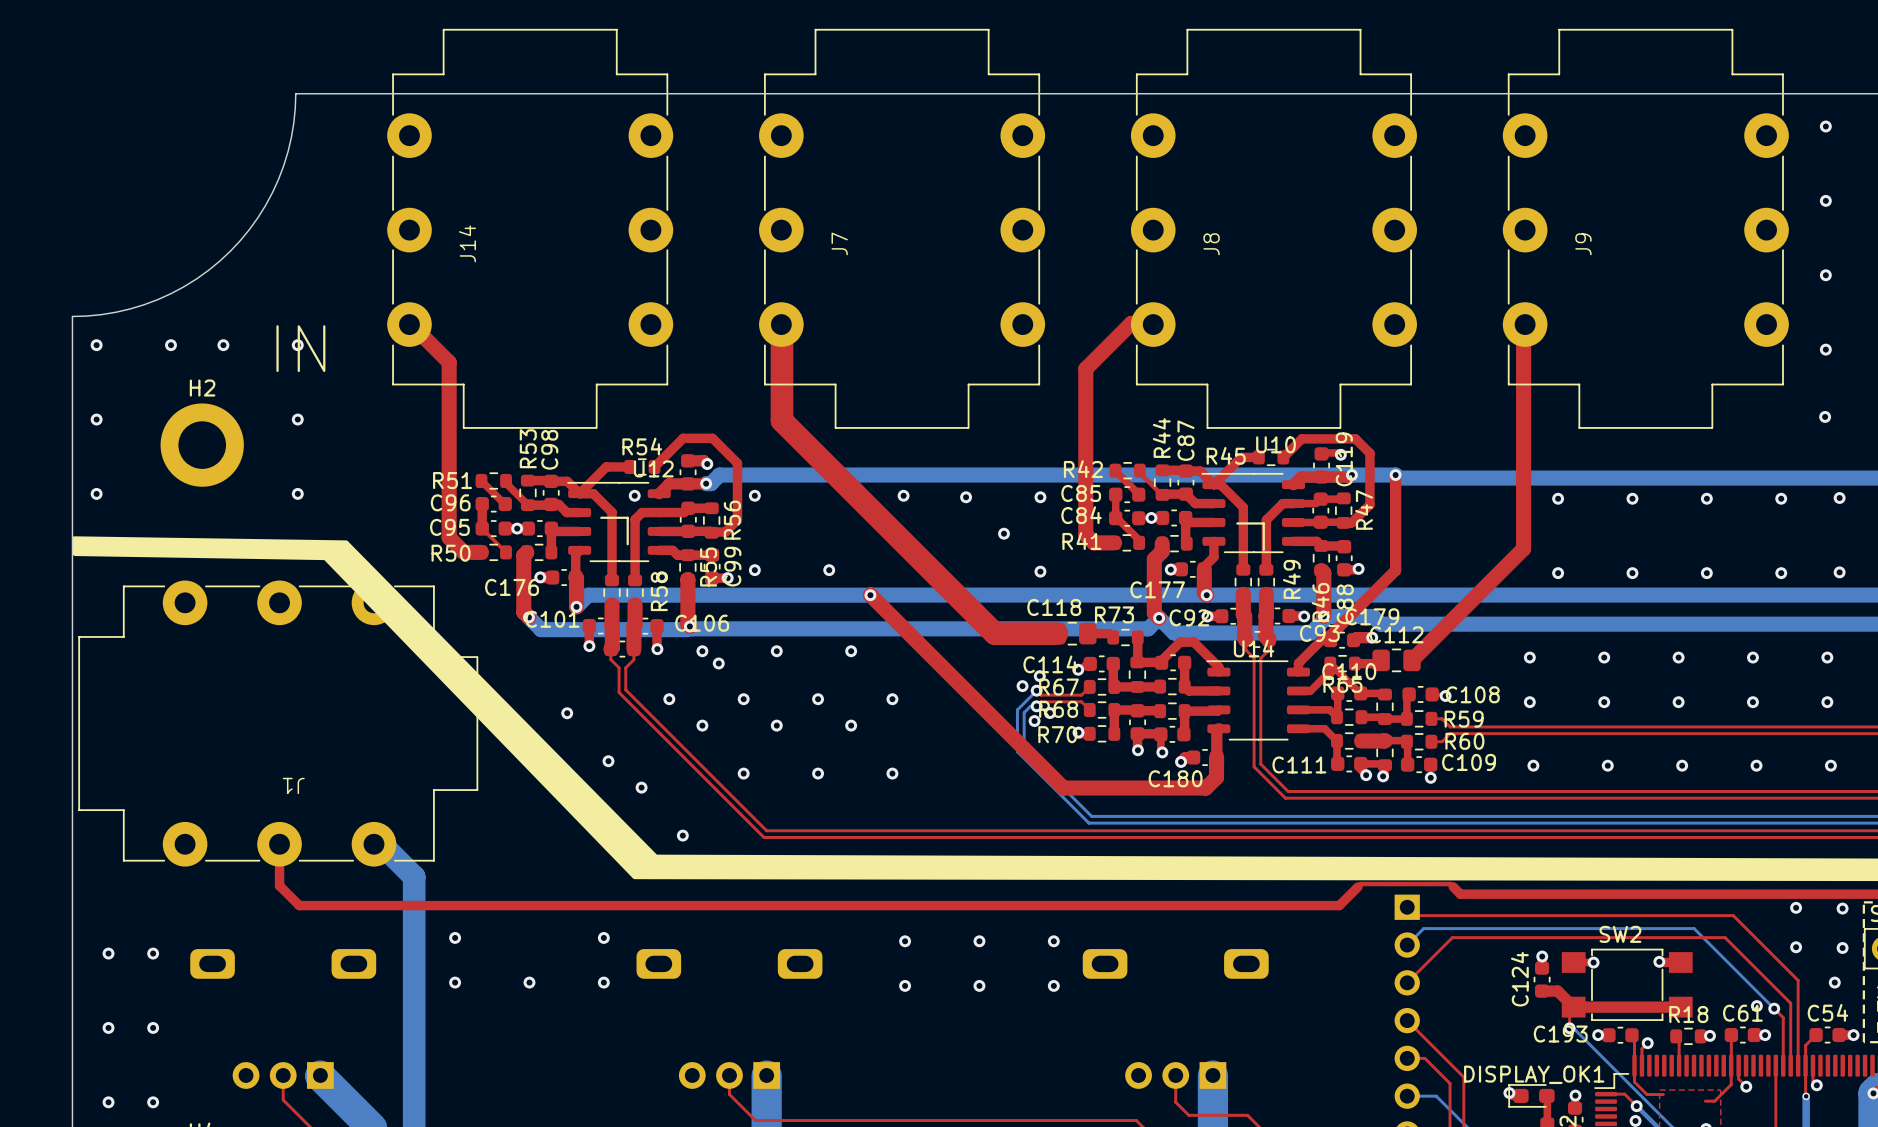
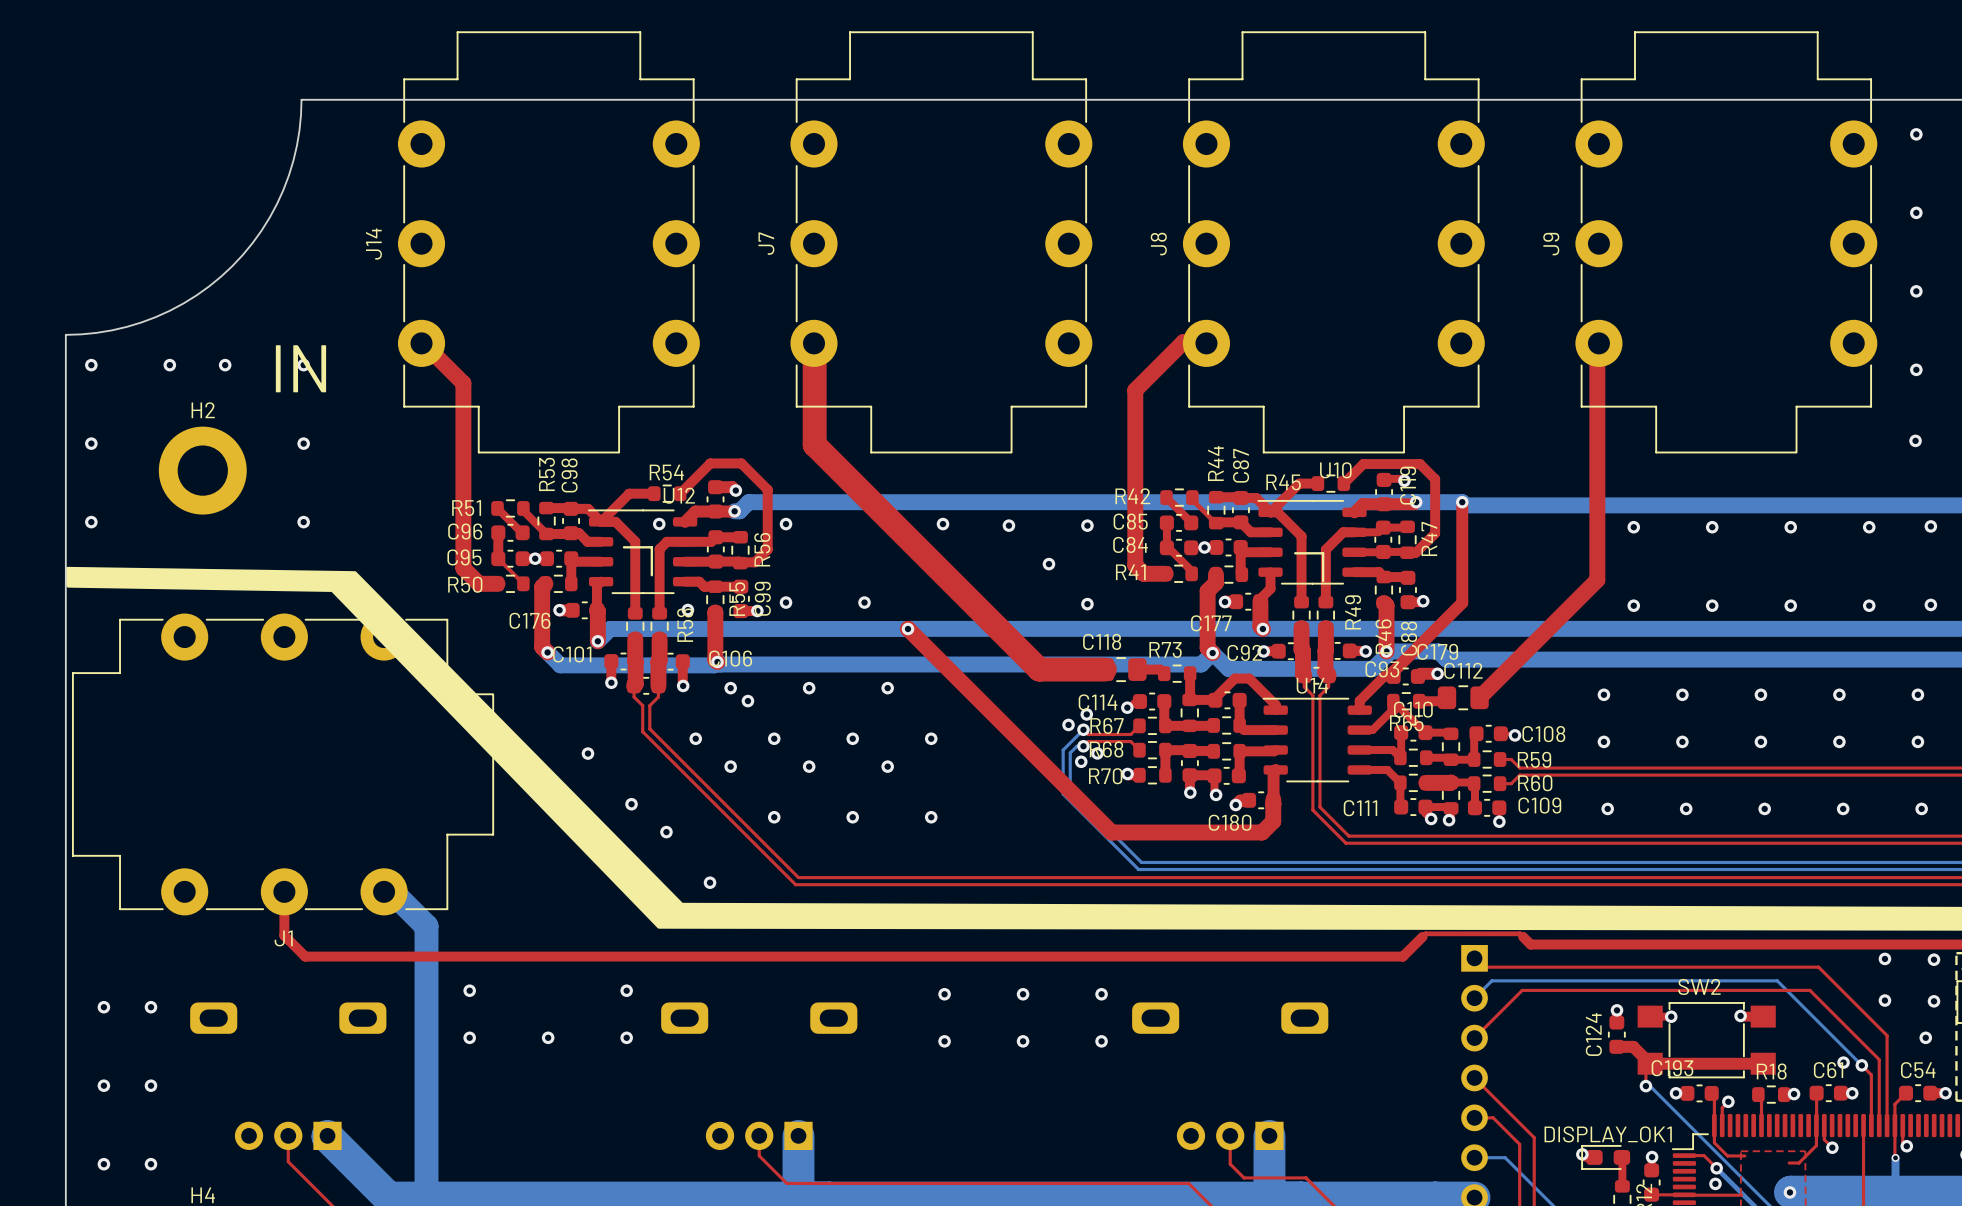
J14 name position: J14 (467, 243) -> J14 (373, 244)
J7 name position: J7 (839, 243) -> J7 (766, 243)
J8 name position: J8 (1211, 244) -> J8 (1158, 244)
J9 name position: J9 (1583, 244) -> J9 (1551, 244)
J1 name rotation: 0° (293, 785) -> 180° (283, 938)
J1 name position: J1 (293, 785) -> J1 (283, 938)
C193 name position: C193 (1560, 1034) -> C193 (1672, 1068)

